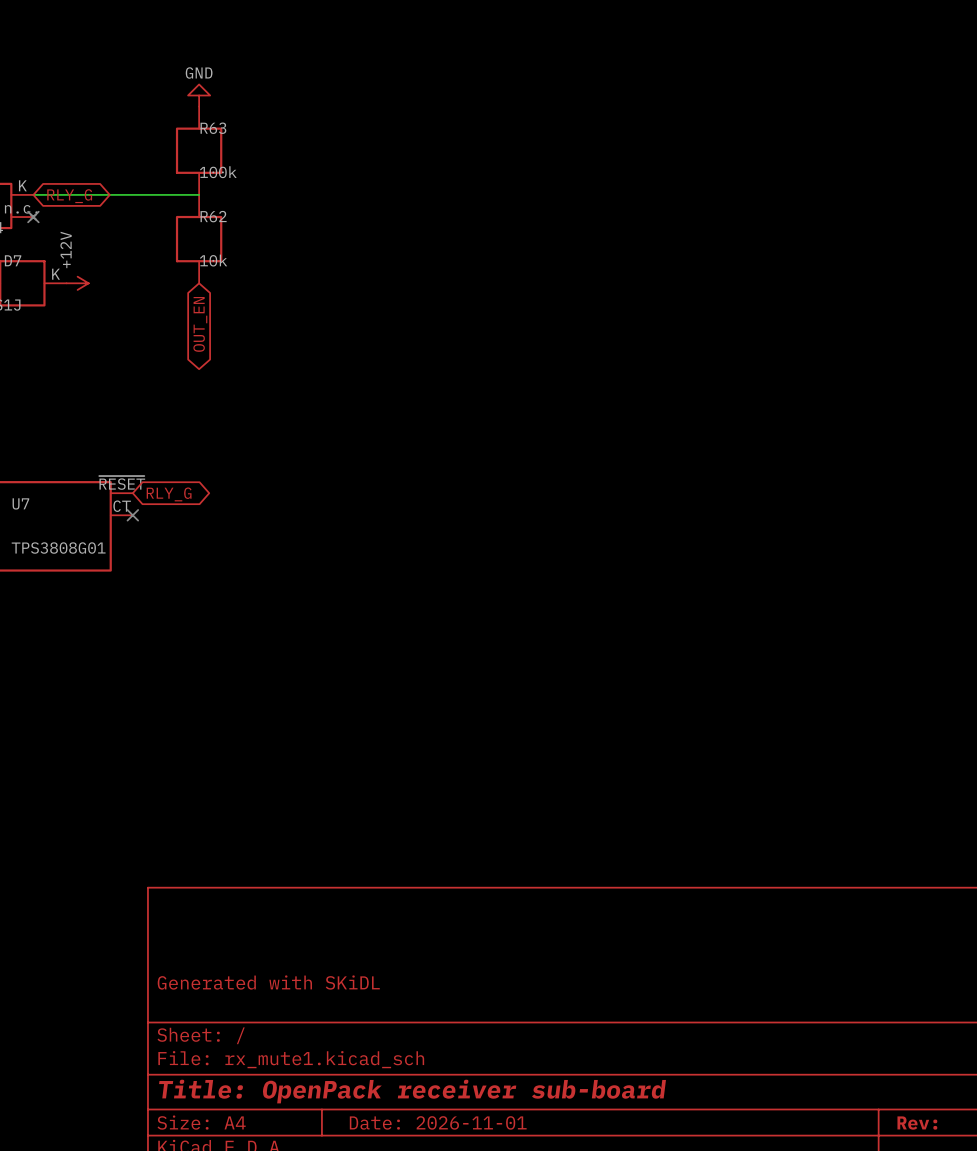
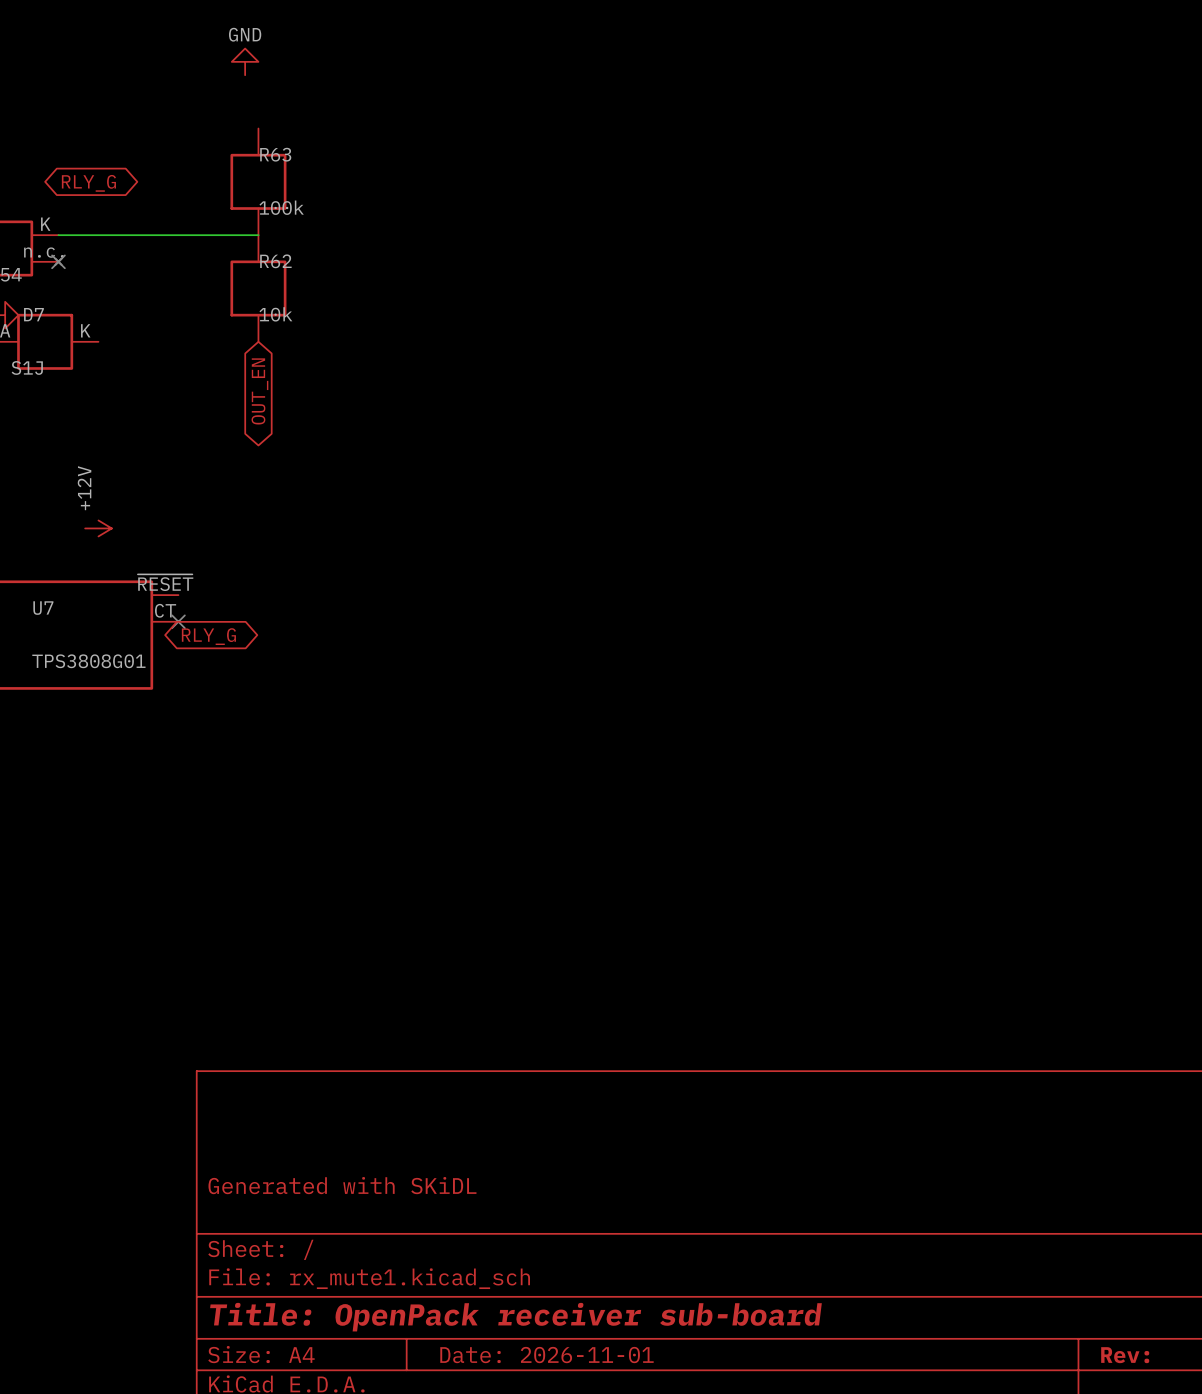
power symbol position: GND (199, 95) -> GND (245, 61)
global label position: RLY_G (69, 196) -> RLY_G (88, 183)
power symbol position: +12V (77, 283) -> +12V (98, 528)
global label position: RLY_G (169, 494) -> RLY_G (208, 636)

